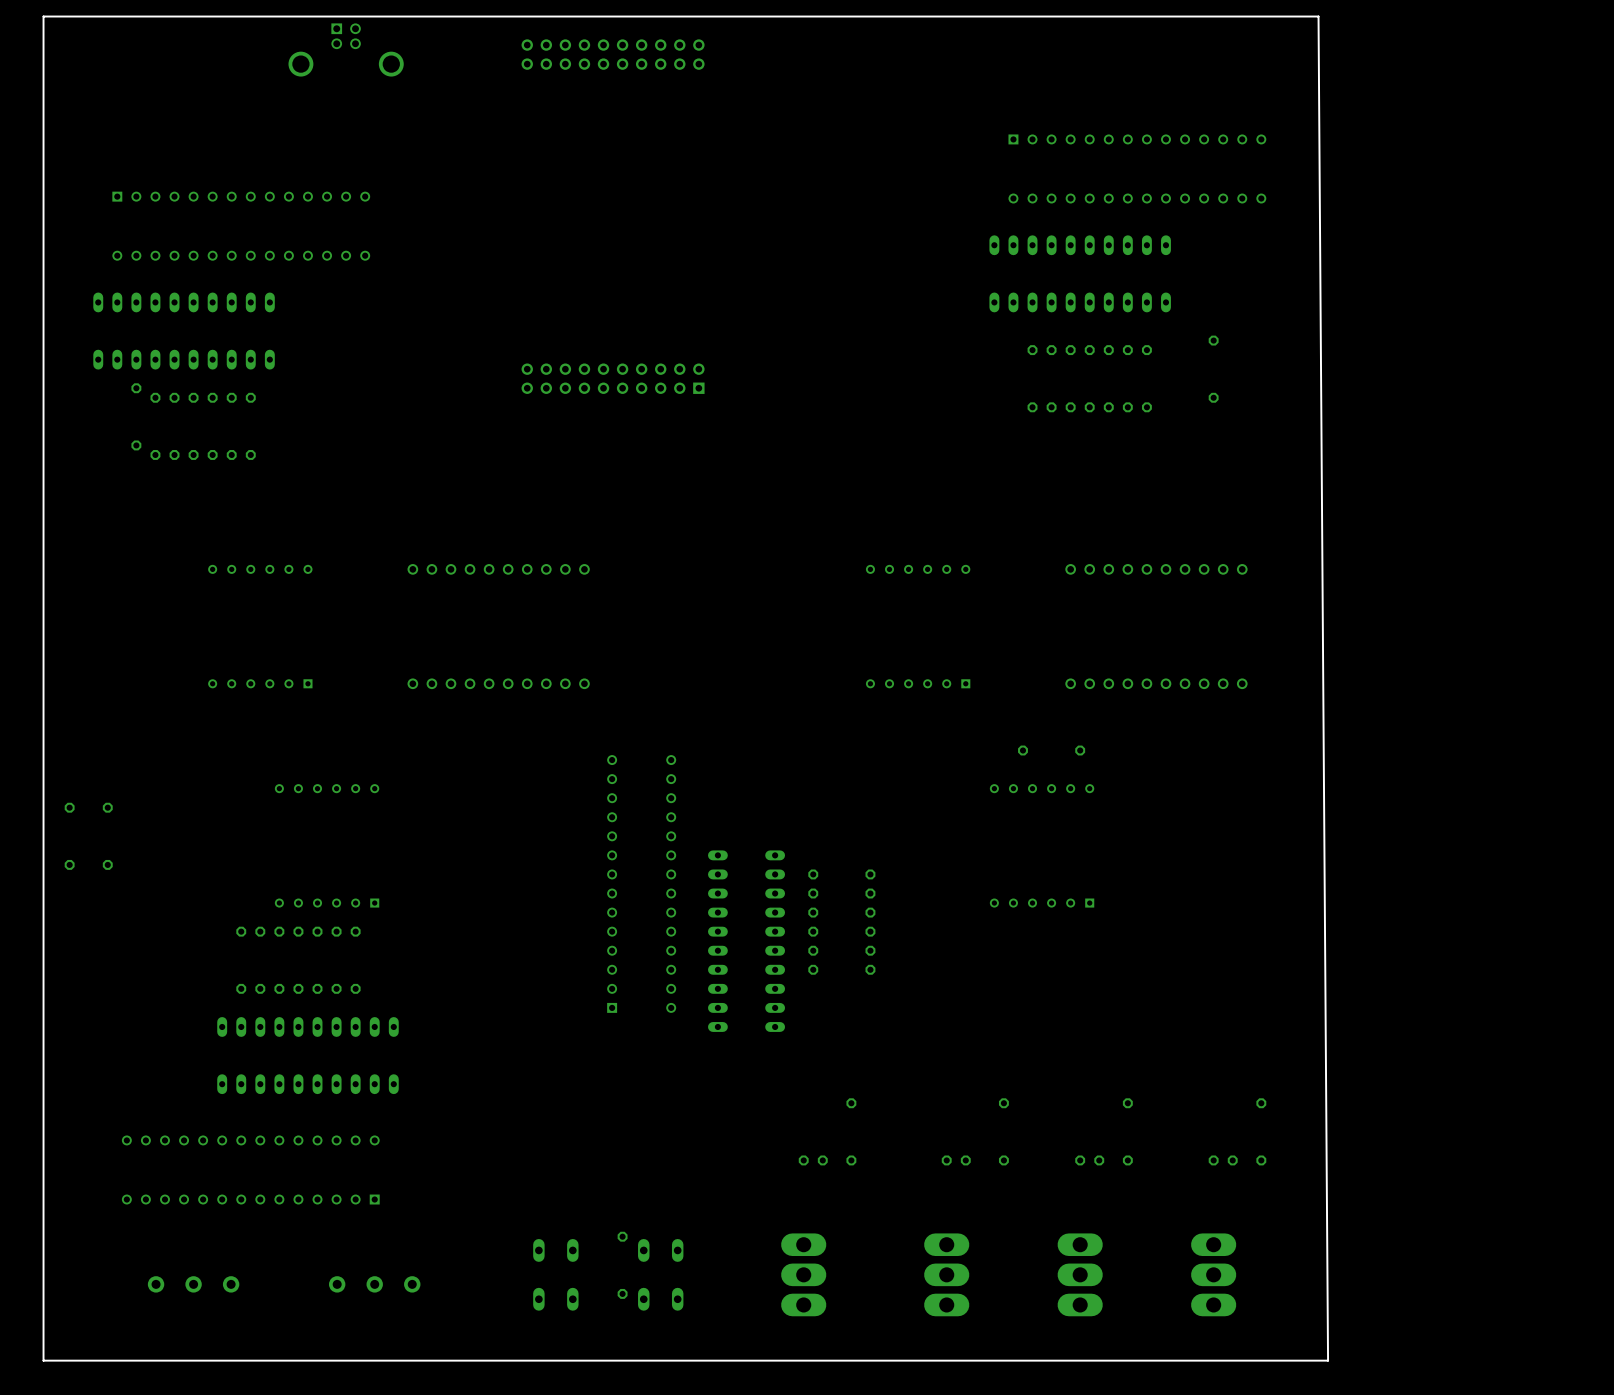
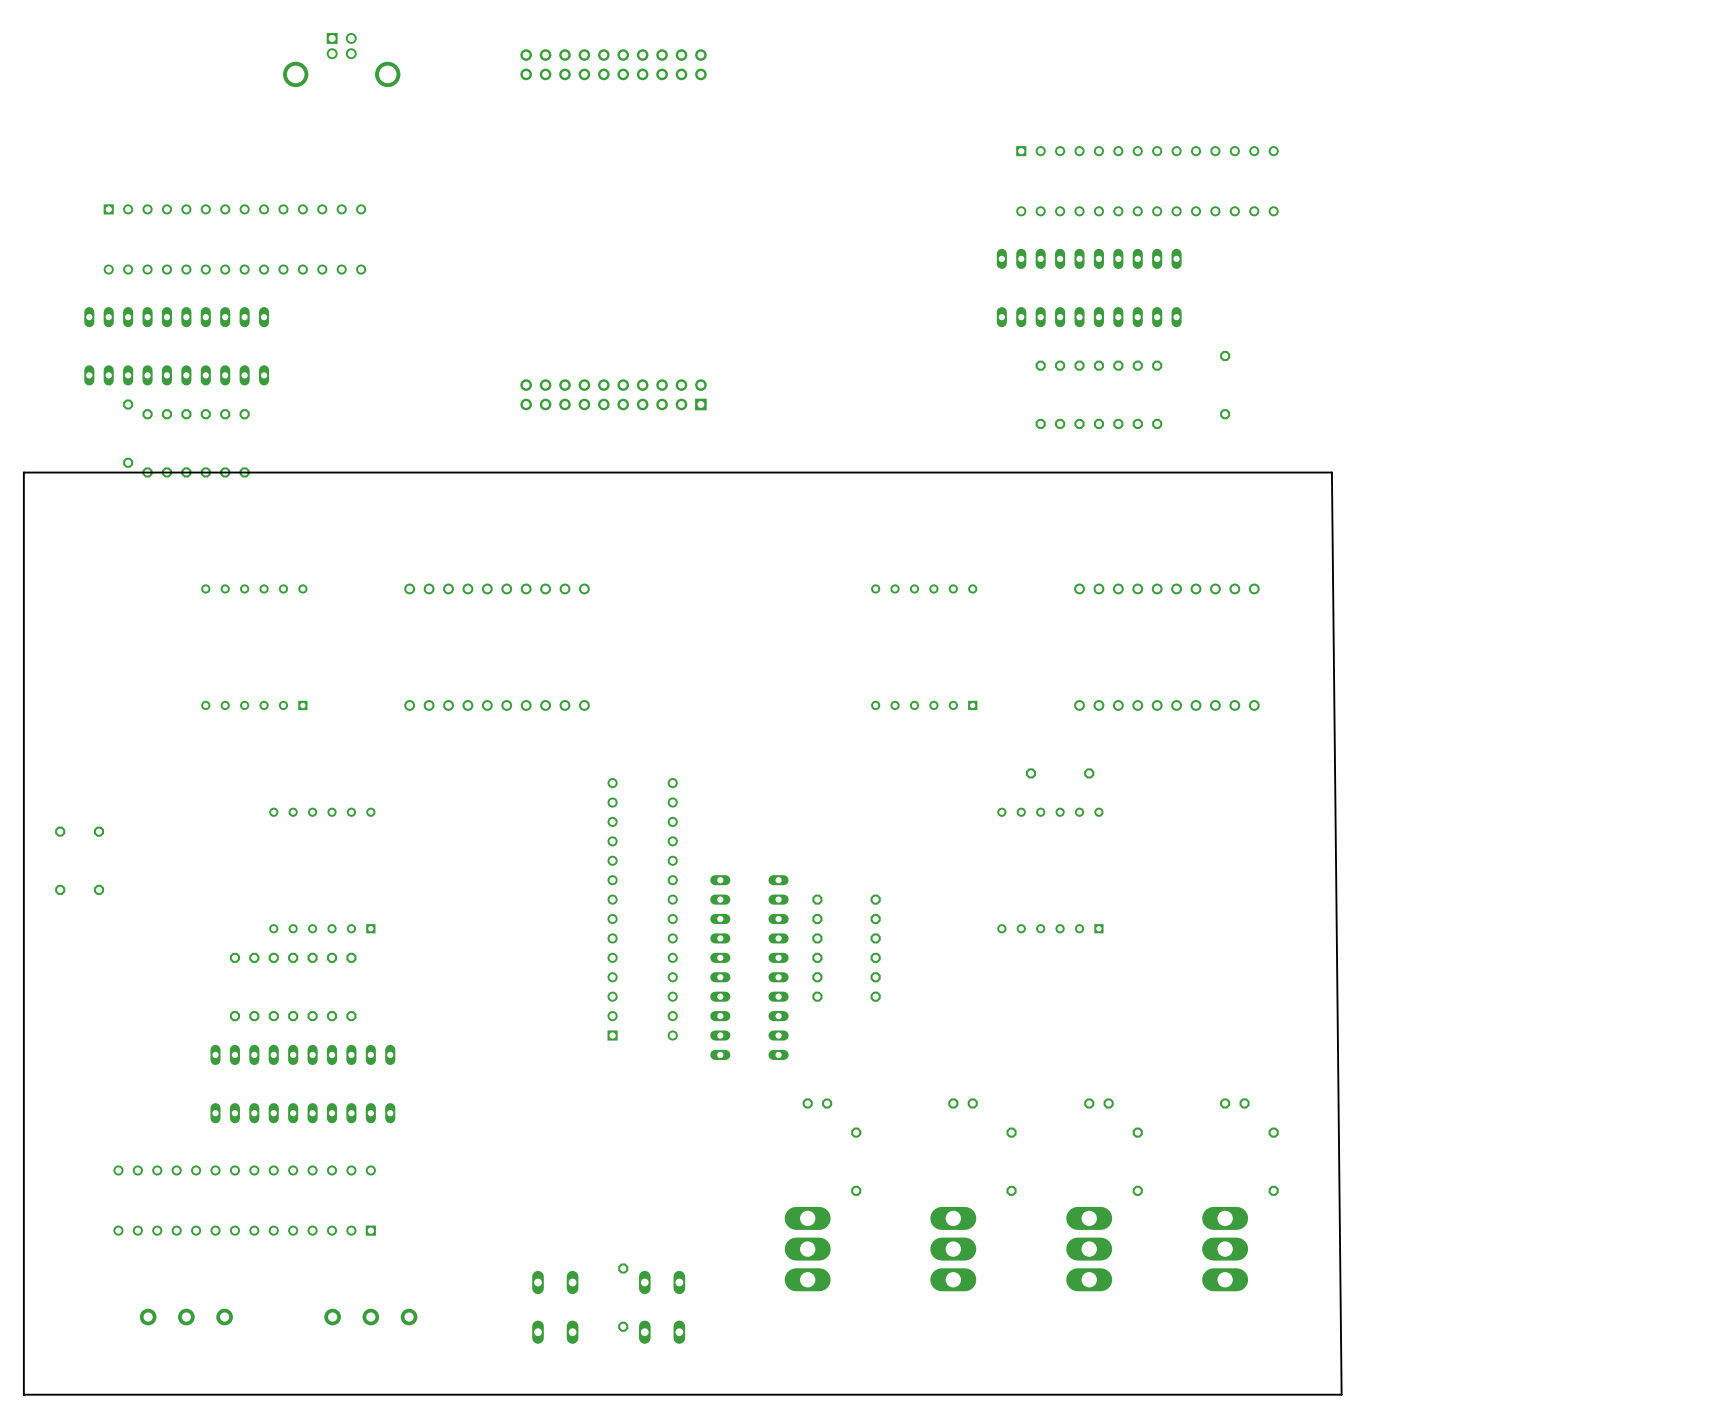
part: none -> (817, 1103)
part: none -> (963, 1103)
part: none -> (1098, 1103)
part: none -> (1234, 1103)
part: (813, 1160) -> none
part: (956, 1160) -> none
part: (1089, 1160) -> none
part: (1223, 1160) -> none
part position: (803, 1274) -> (807, 1249)
part position: (946, 1274) -> (953, 1249)
part position: (1080, 1274) -> (1089, 1249)
part position: (1213, 1274) -> (1225, 1249)
board edge: (1328, 1360) (1318, 16) (43, 16) (43, 1360) -> (1341, 1394) (1331, 472) (23, 472) (23, 1394) (33, 1394)

